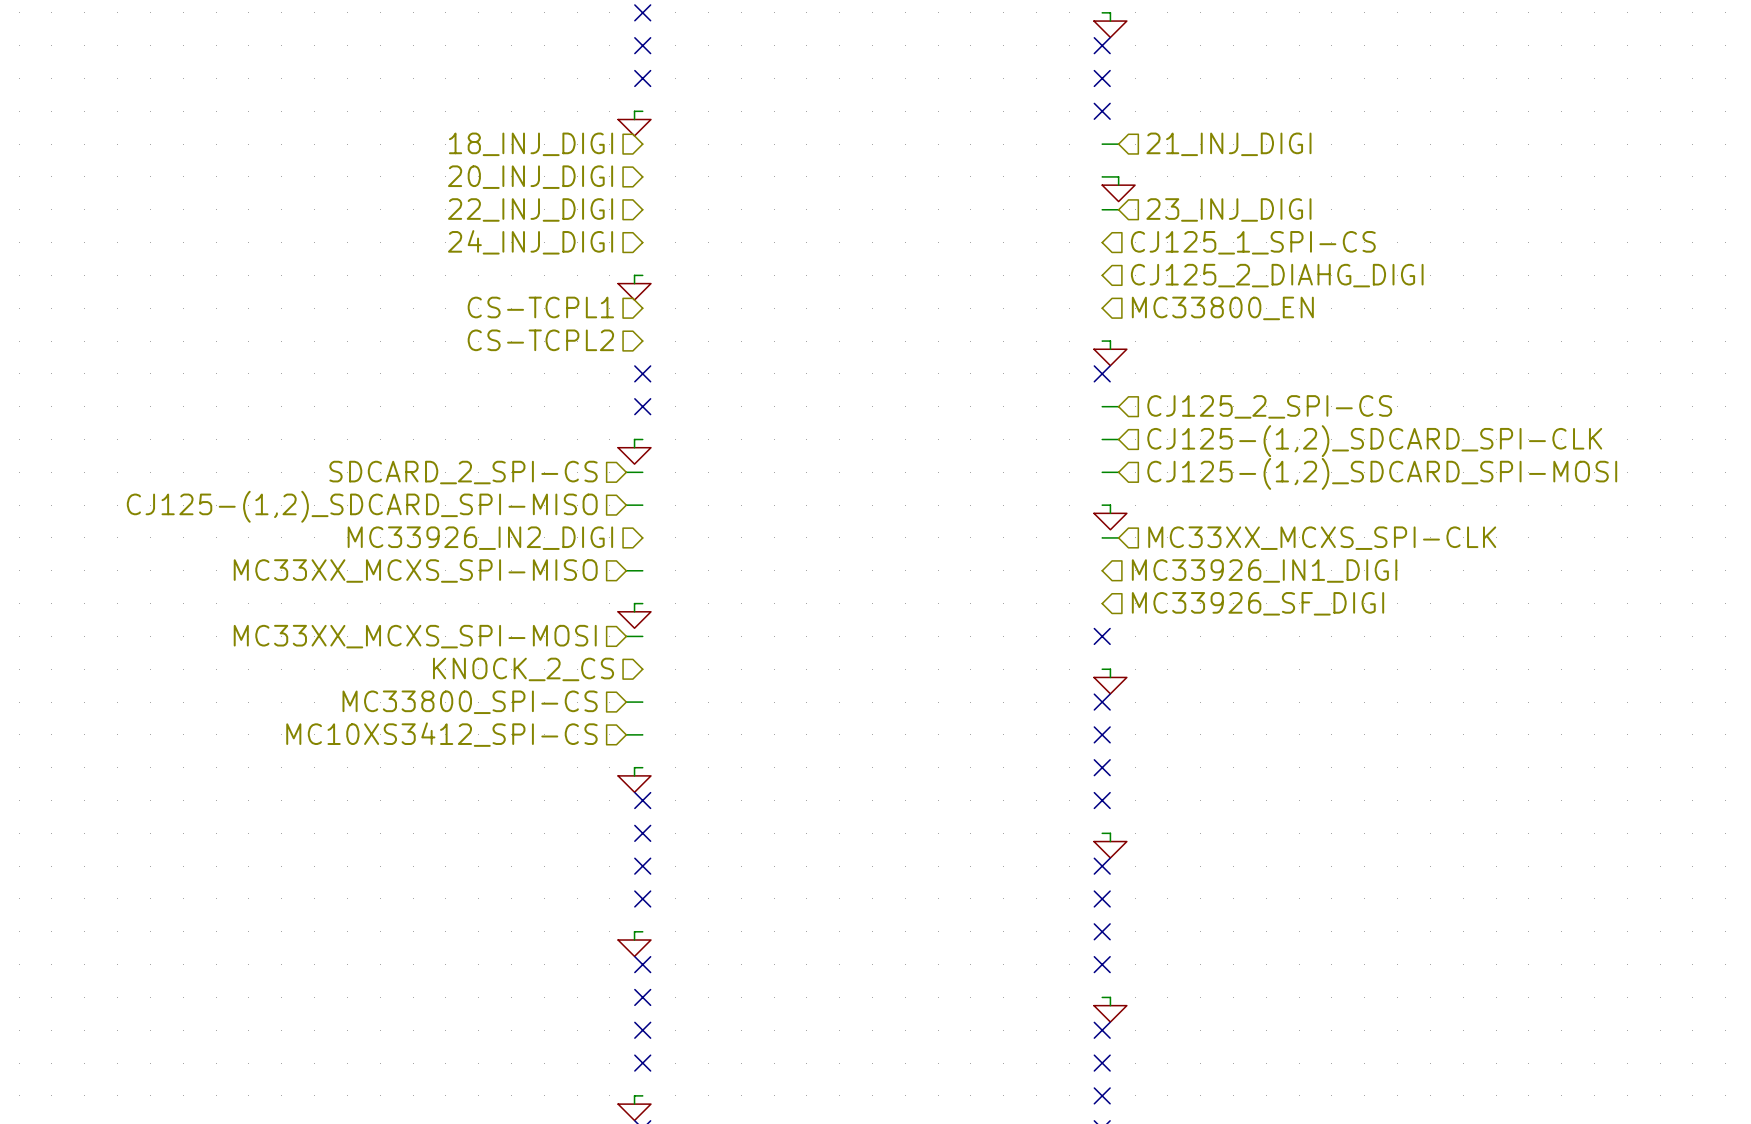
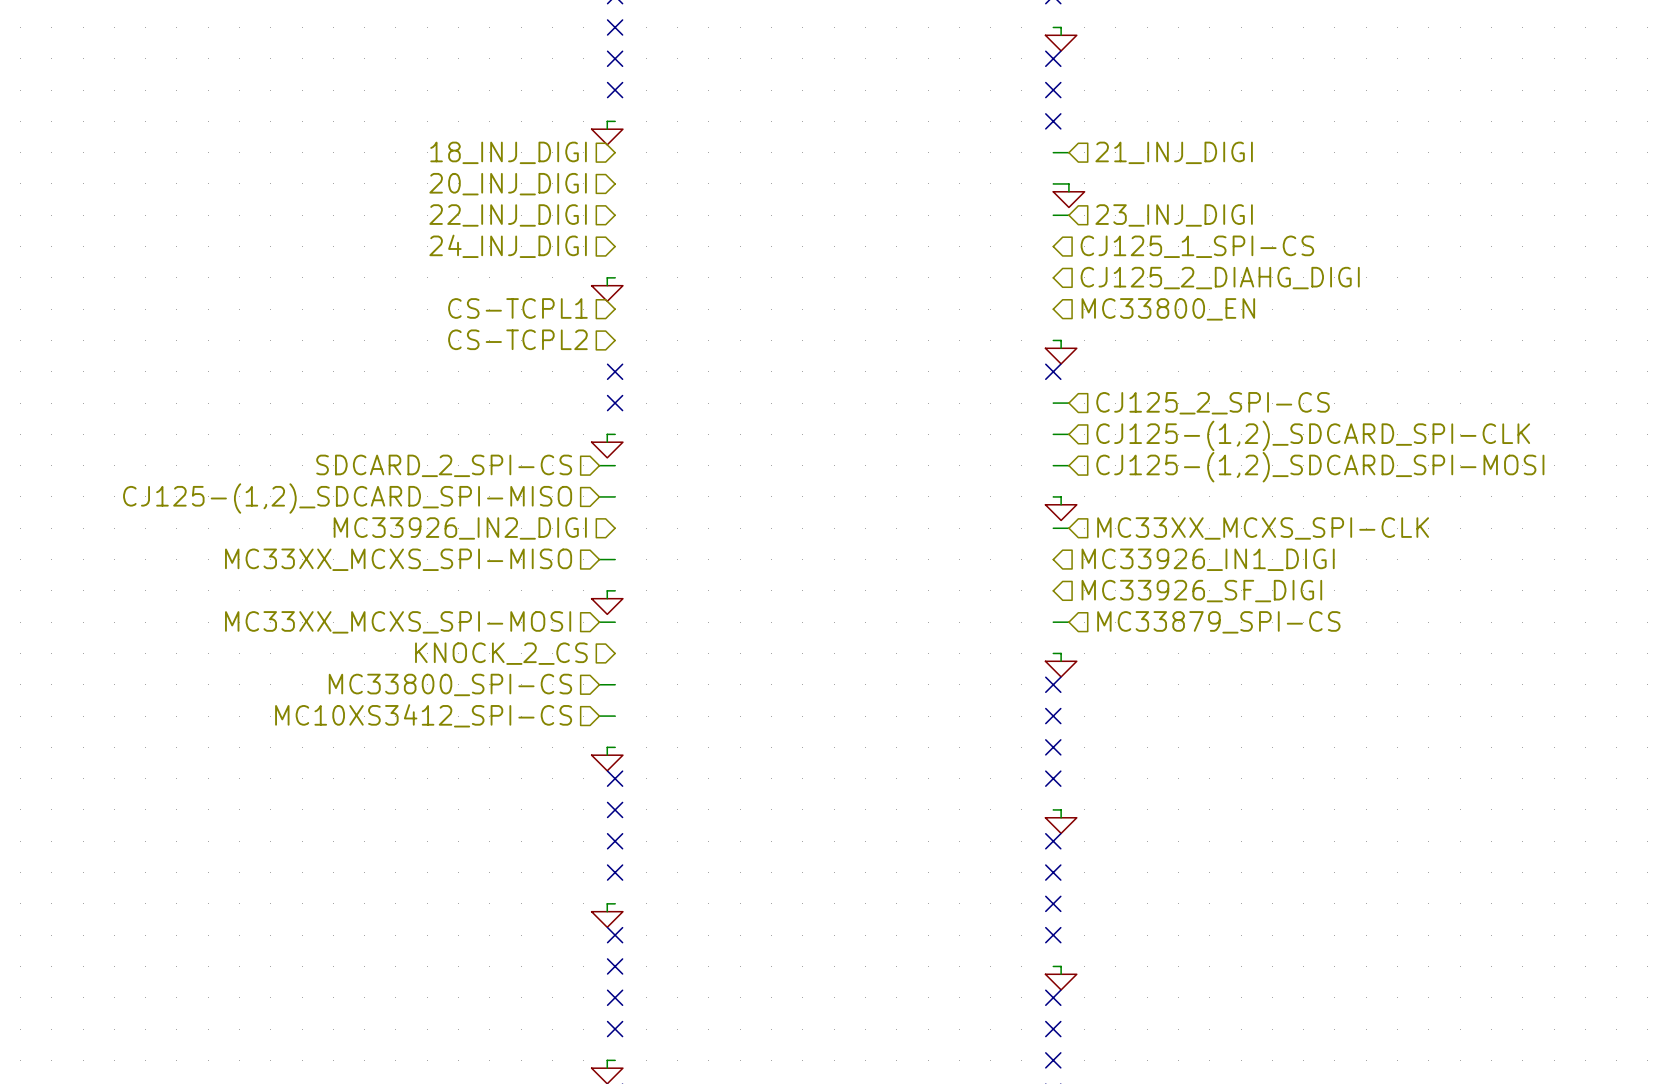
wire: none -> (1053, 622) (1068, 622)
no-connect mark: (1102, 636) -> none
hierarchical label: none -> MC33879_SPI-CS (1218, 622)

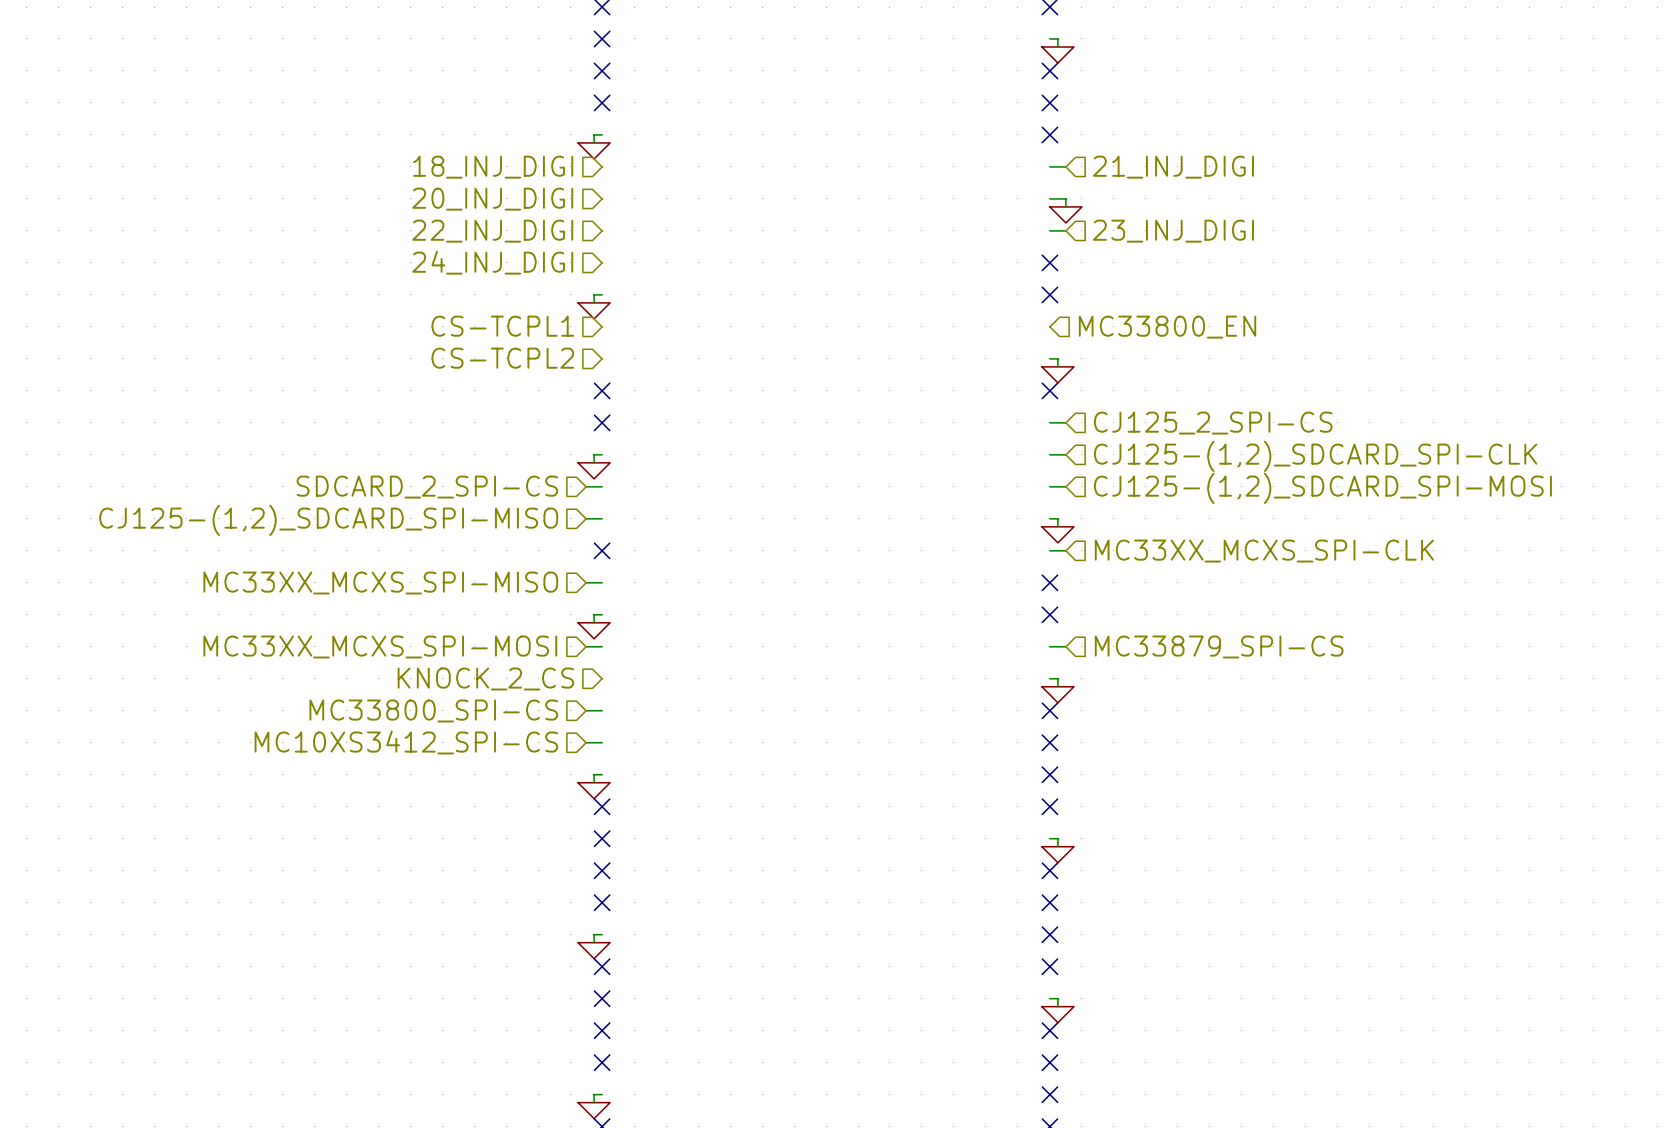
no-connect mark: none -> (1049, 262)
hierarchical label: CJ125_1_SPI-CS (1197, 246) -> none
no-connect mark: none -> (1049, 294)
hierarchical label: CJ125_2_DIAHG_DIGI (1220, 278) -> none
hierarchical label: MC33926_IN2_DIGI (460, 528) -> none
no-connect mark: none -> (602, 550)
no-connect mark: none -> (1049, 582)
hierarchical label: MC33926_IN1_DIGI (1208, 559) -> none
no-connect mark: none -> (1049, 614)
hierarchical label: MC33926_SF_DIGI (1201, 591) -> none

